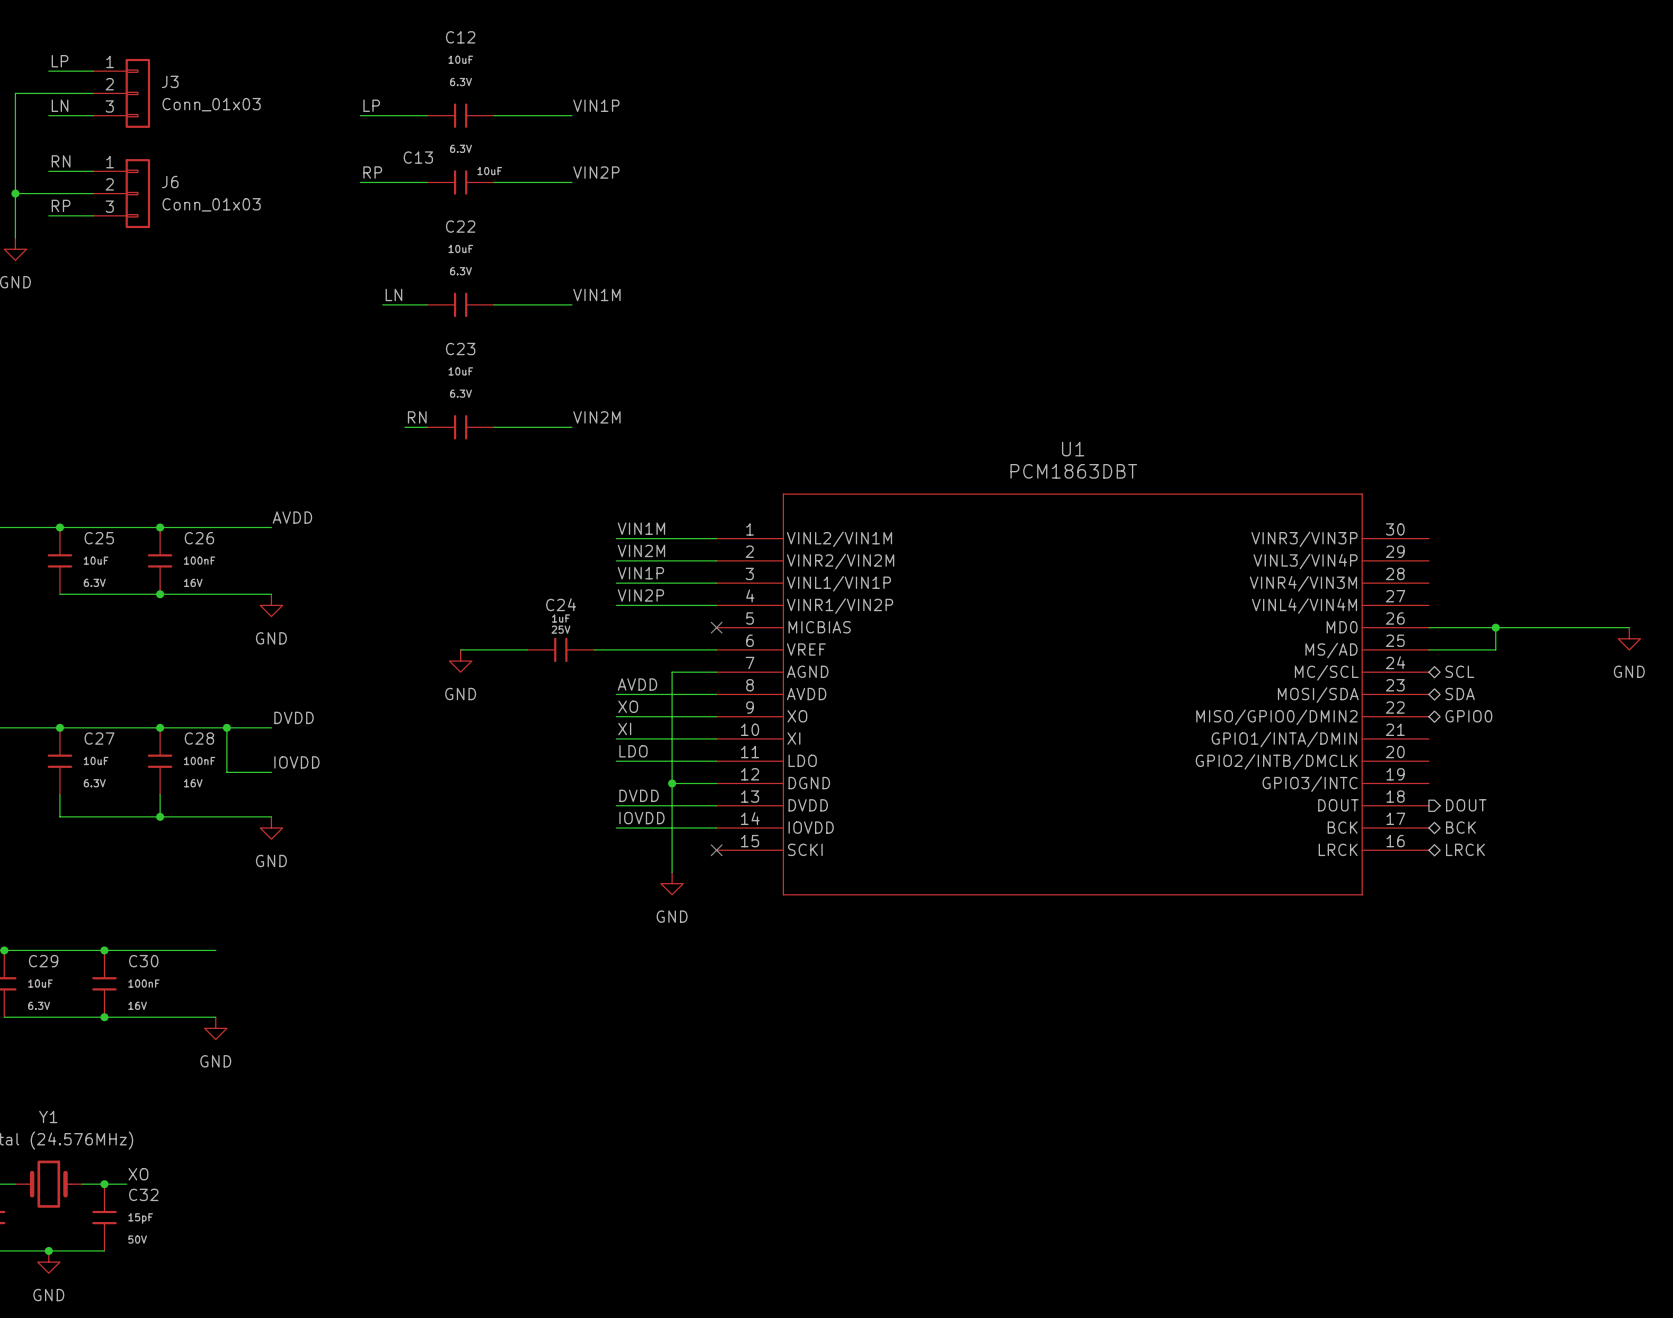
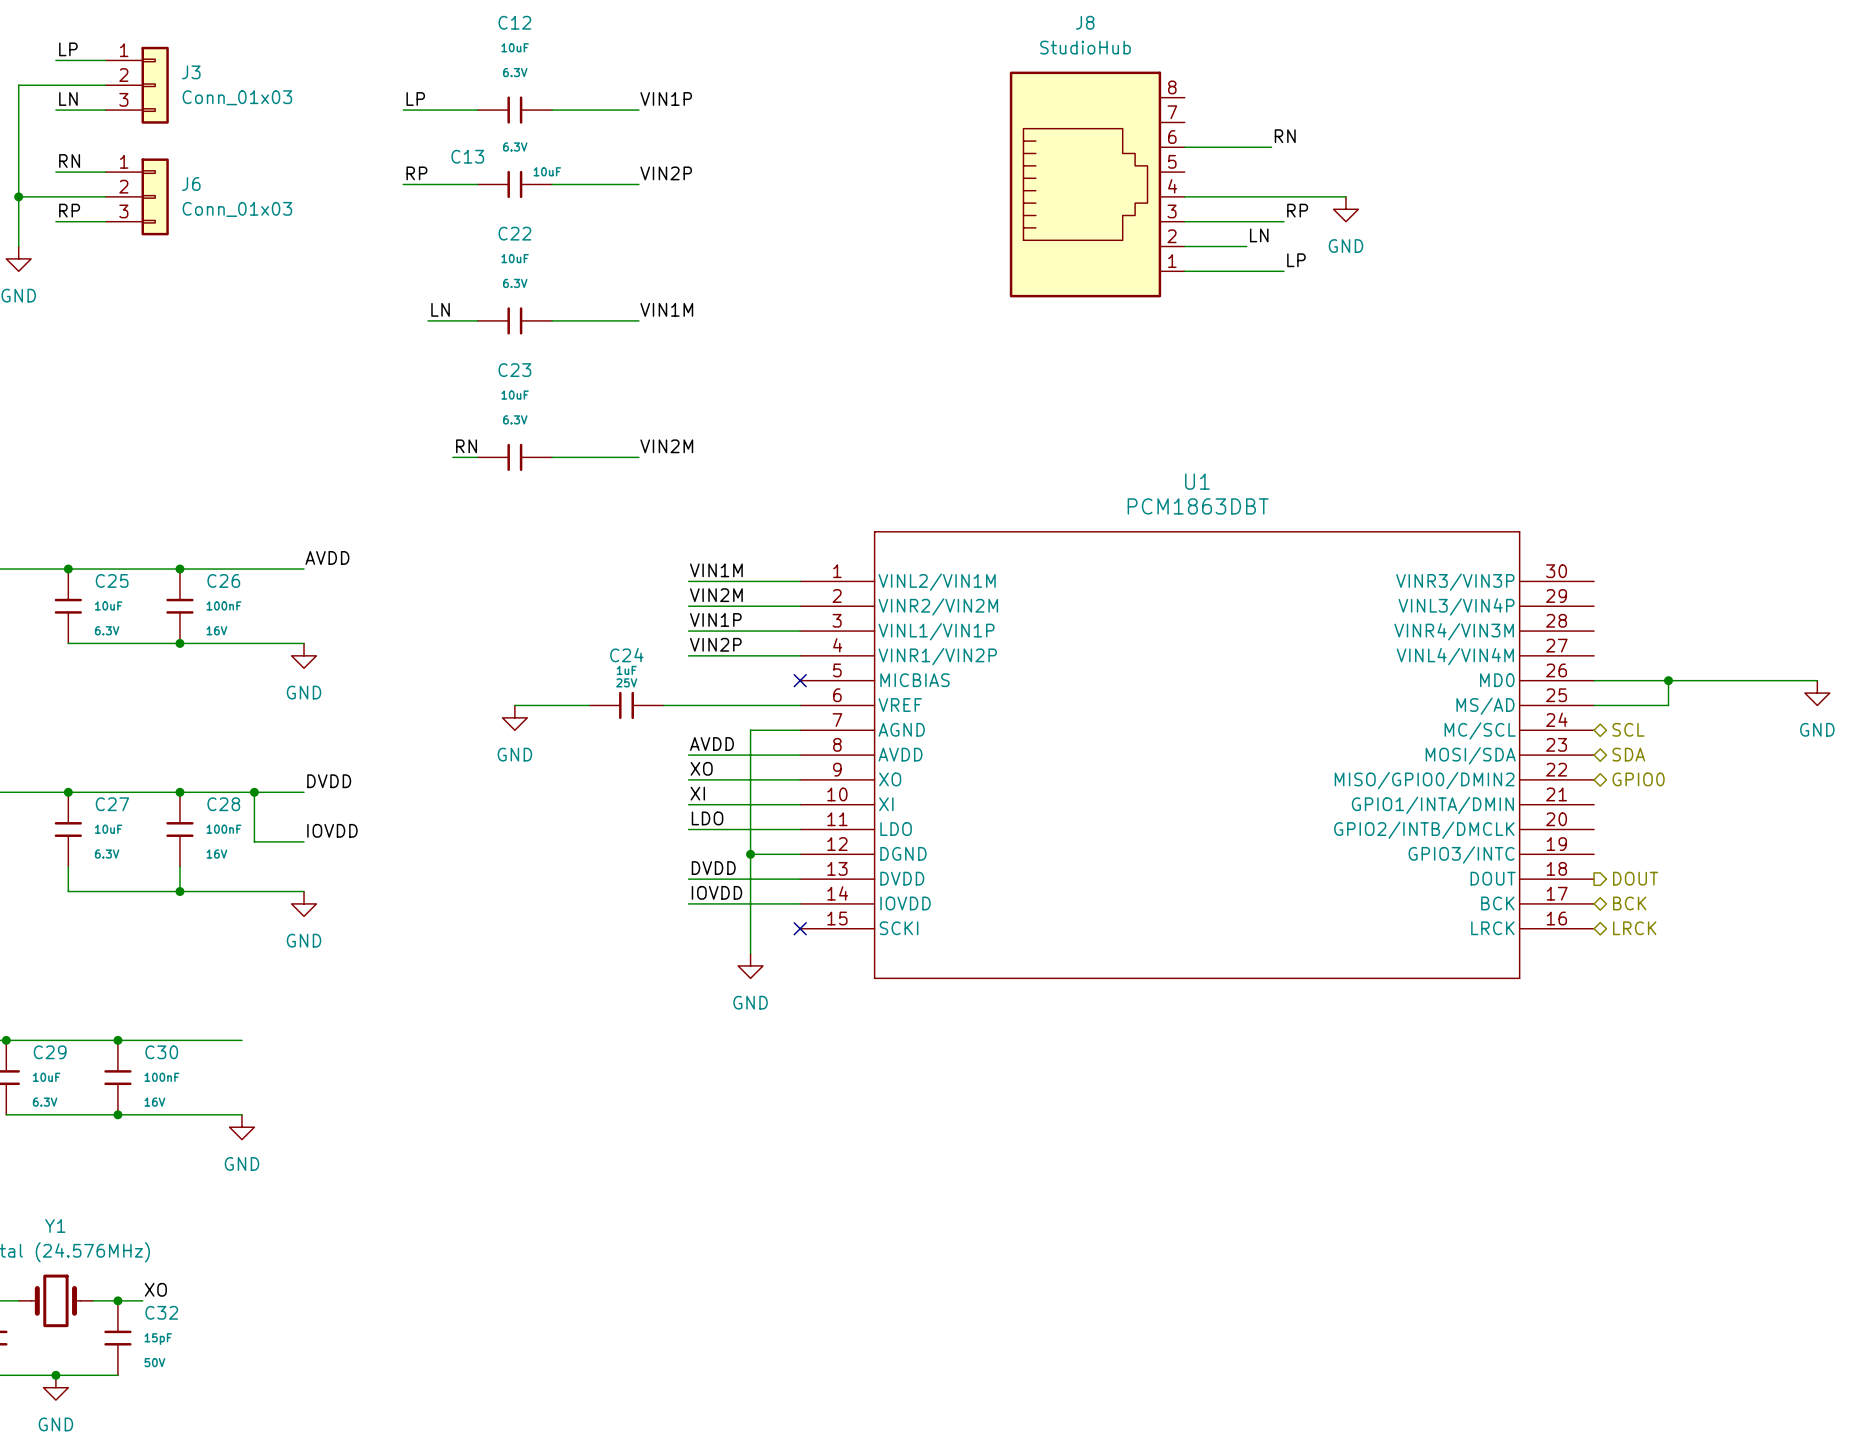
label: none -> RN (1285, 136)
wire: none -> (1184, 147) (1271, 147)
J8: none -> StudioHub (1097, 184)
wire: none -> (1184, 196) (1345, 196)
power symbol: none -> GND (1345, 209)
label: none -> RP (1297, 210)
wire: none -> (1184, 221) (1283, 221)
label: none -> LN (1259, 235)
wire: none -> (1184, 246) (1246, 246)
label: none -> LP (1296, 260)
wire: none -> (1184, 271) (1283, 271)

